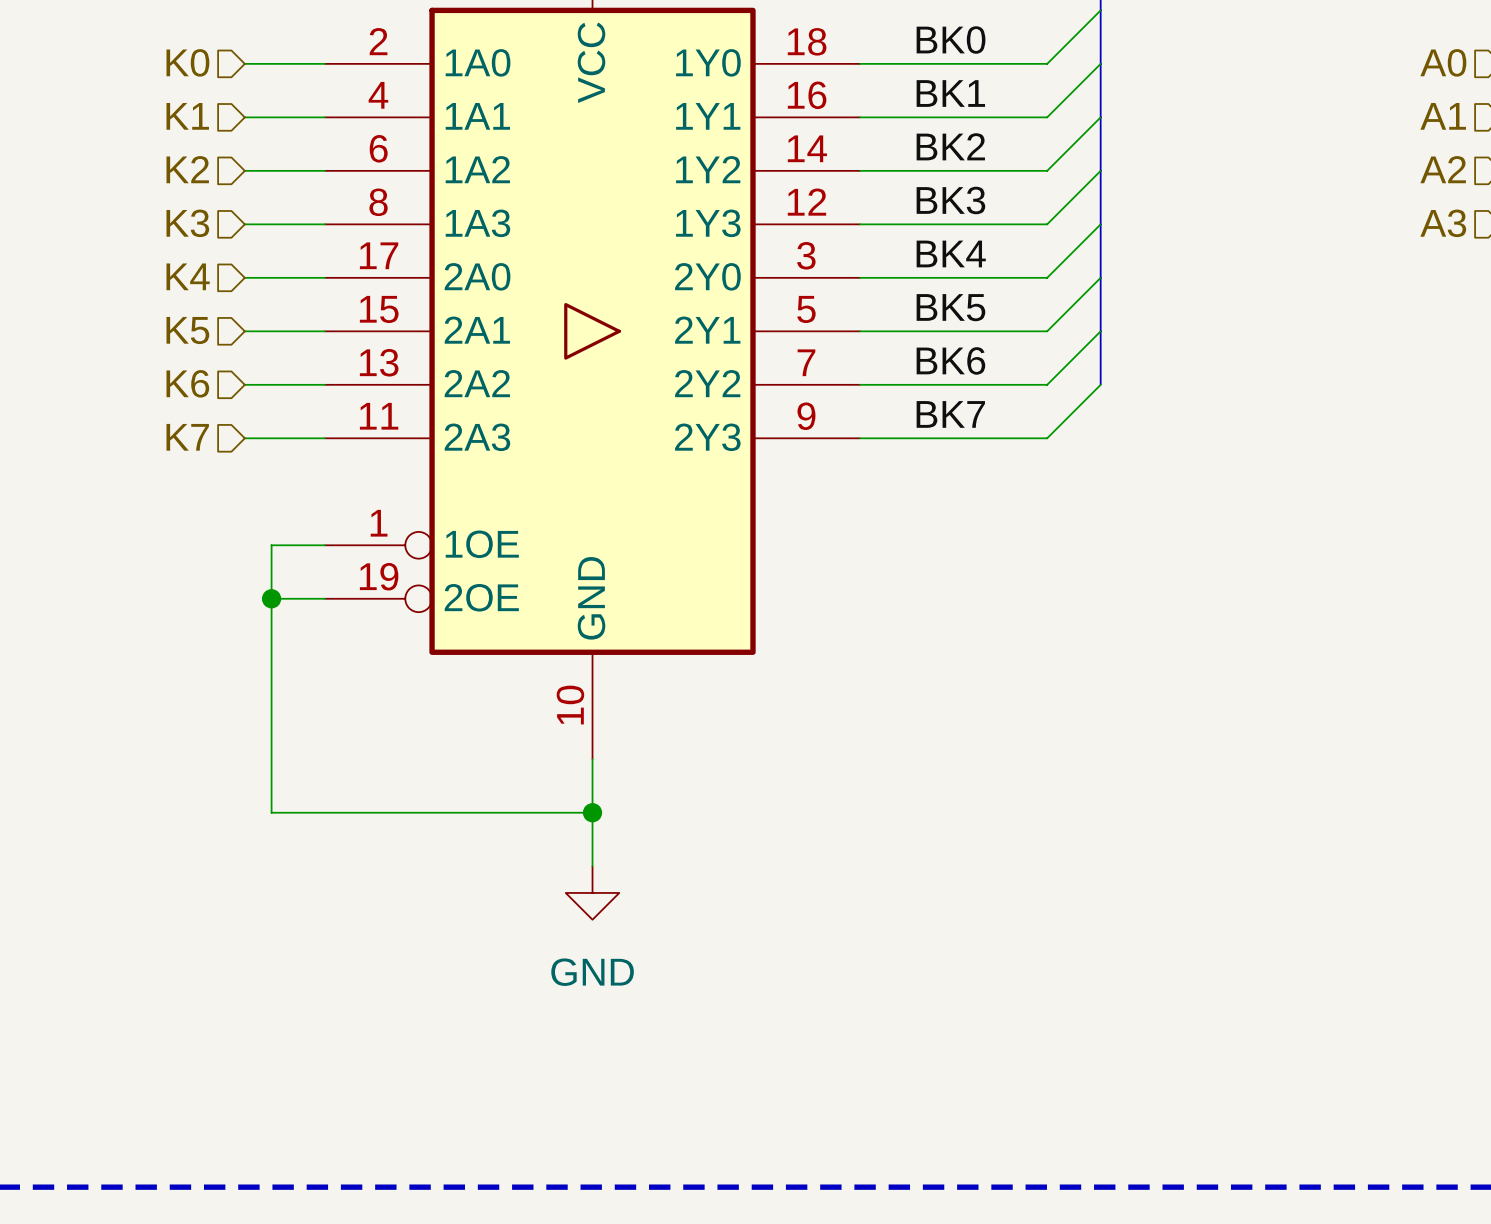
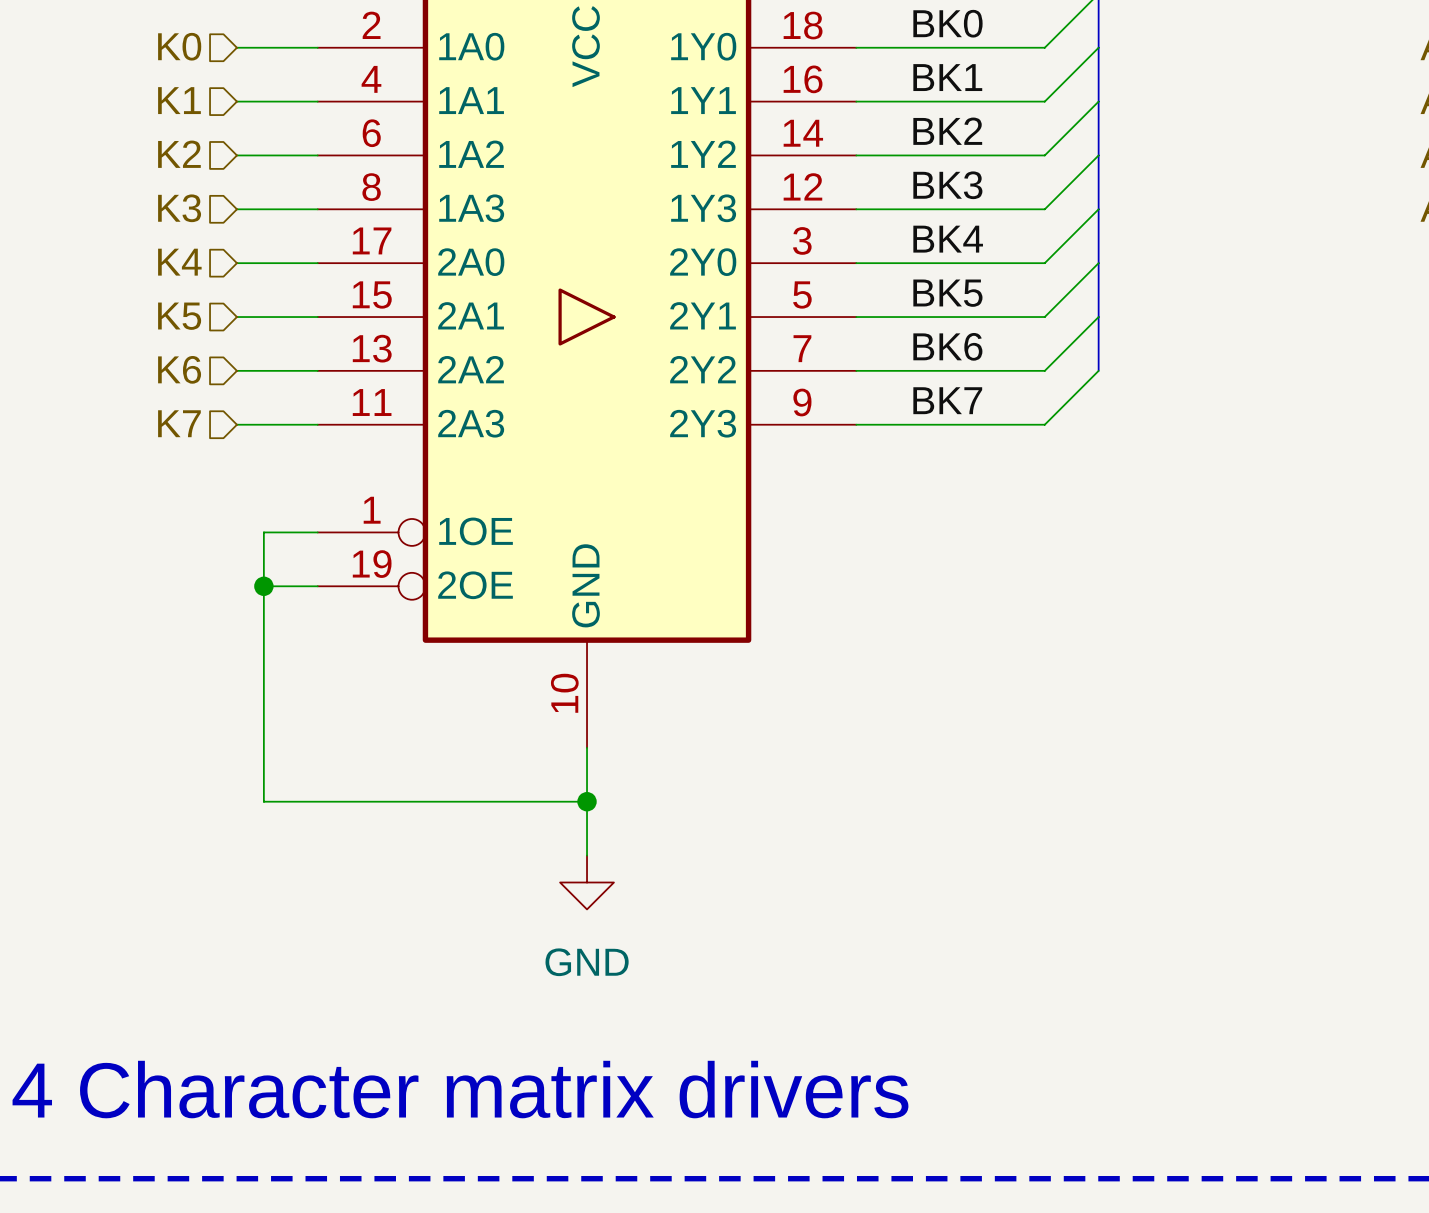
text: none -> 4 Character matrix drivers (460, 1089)

